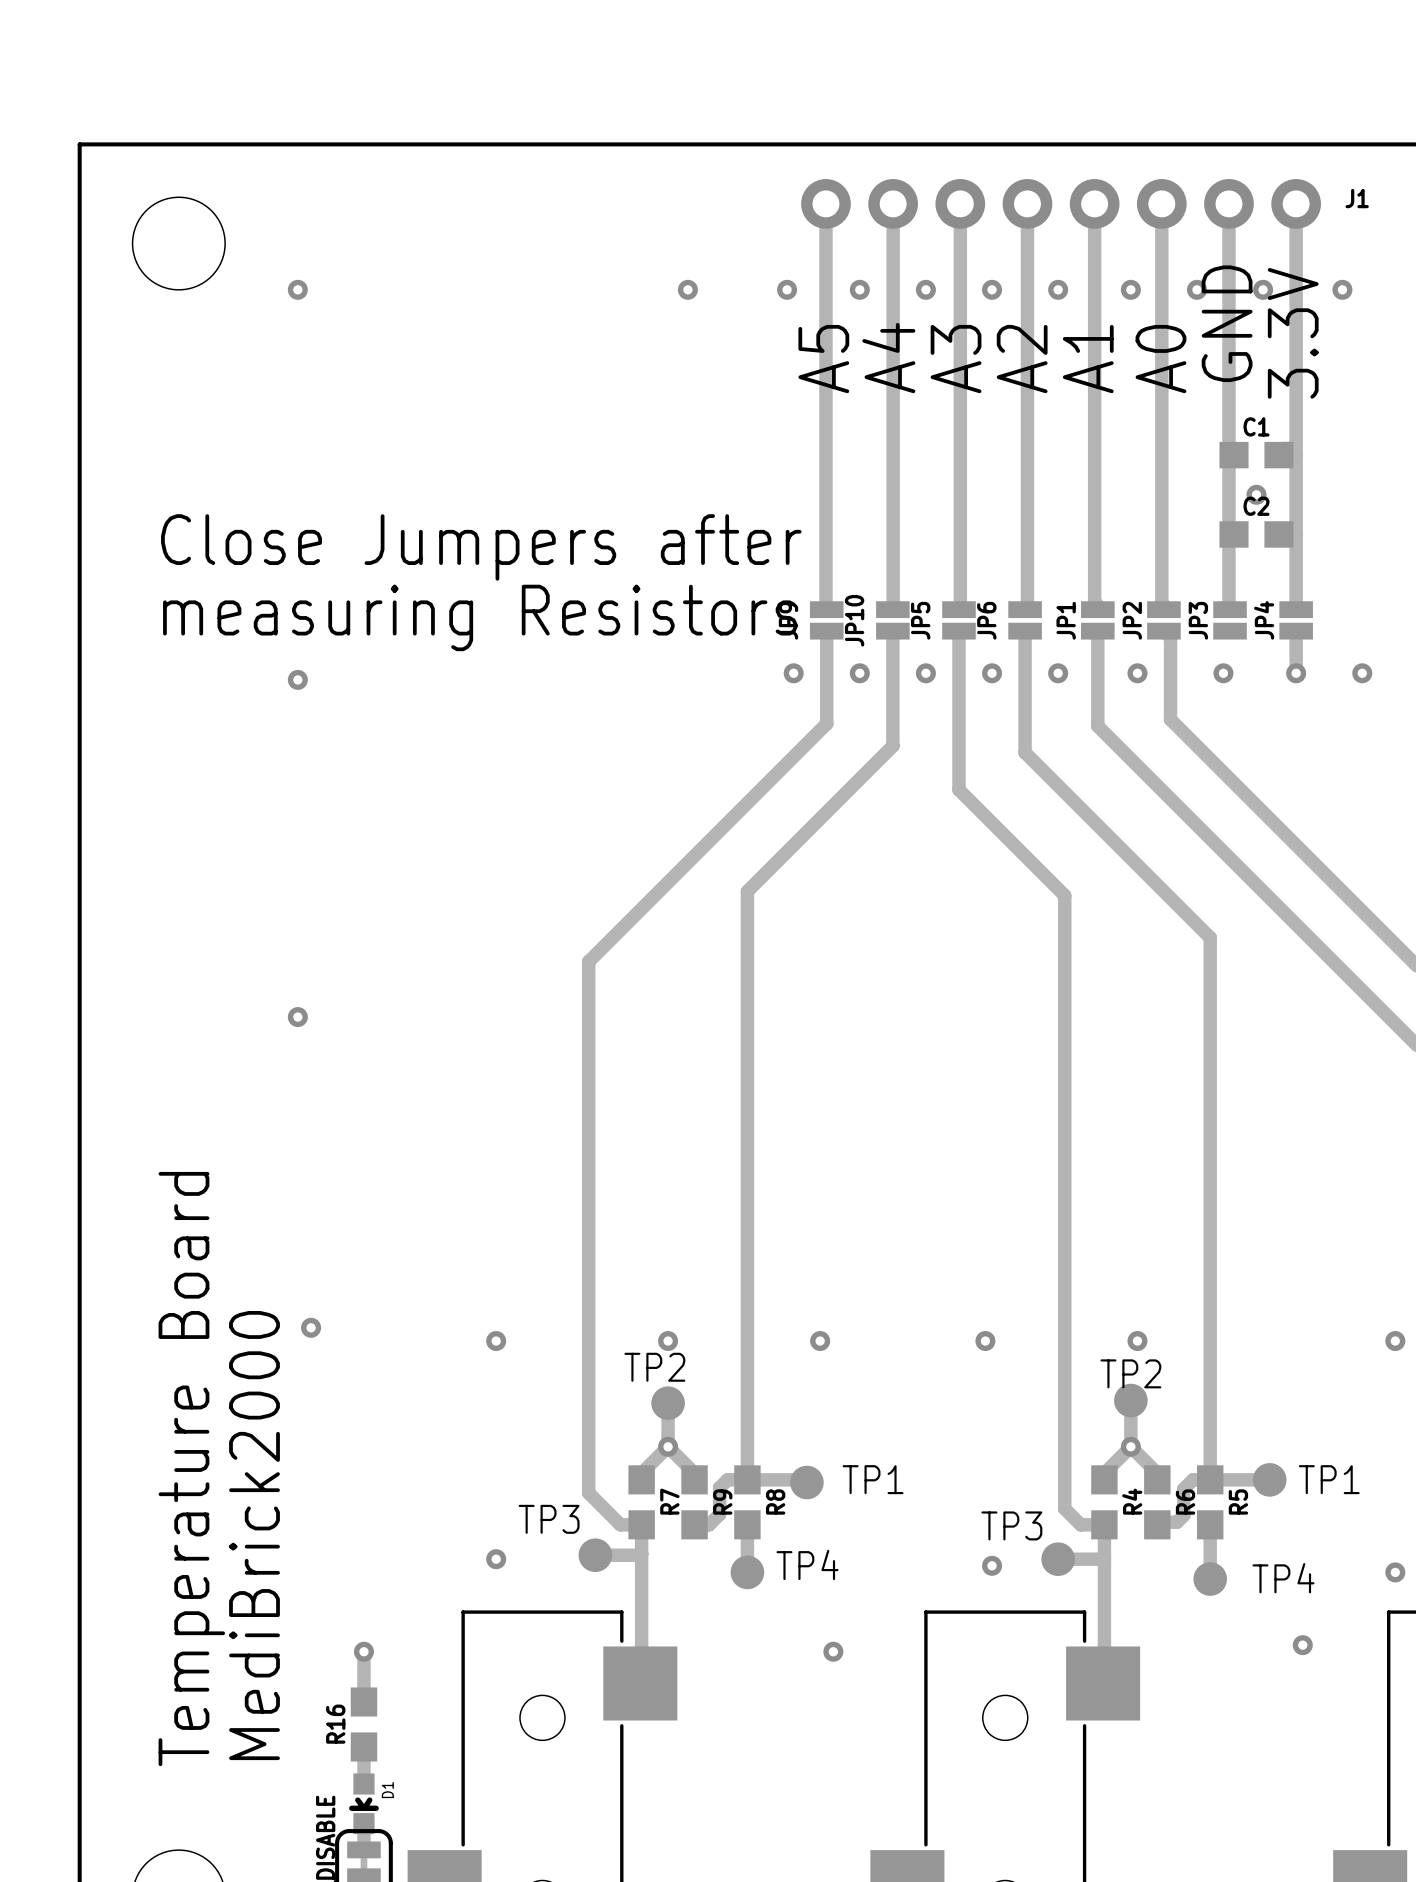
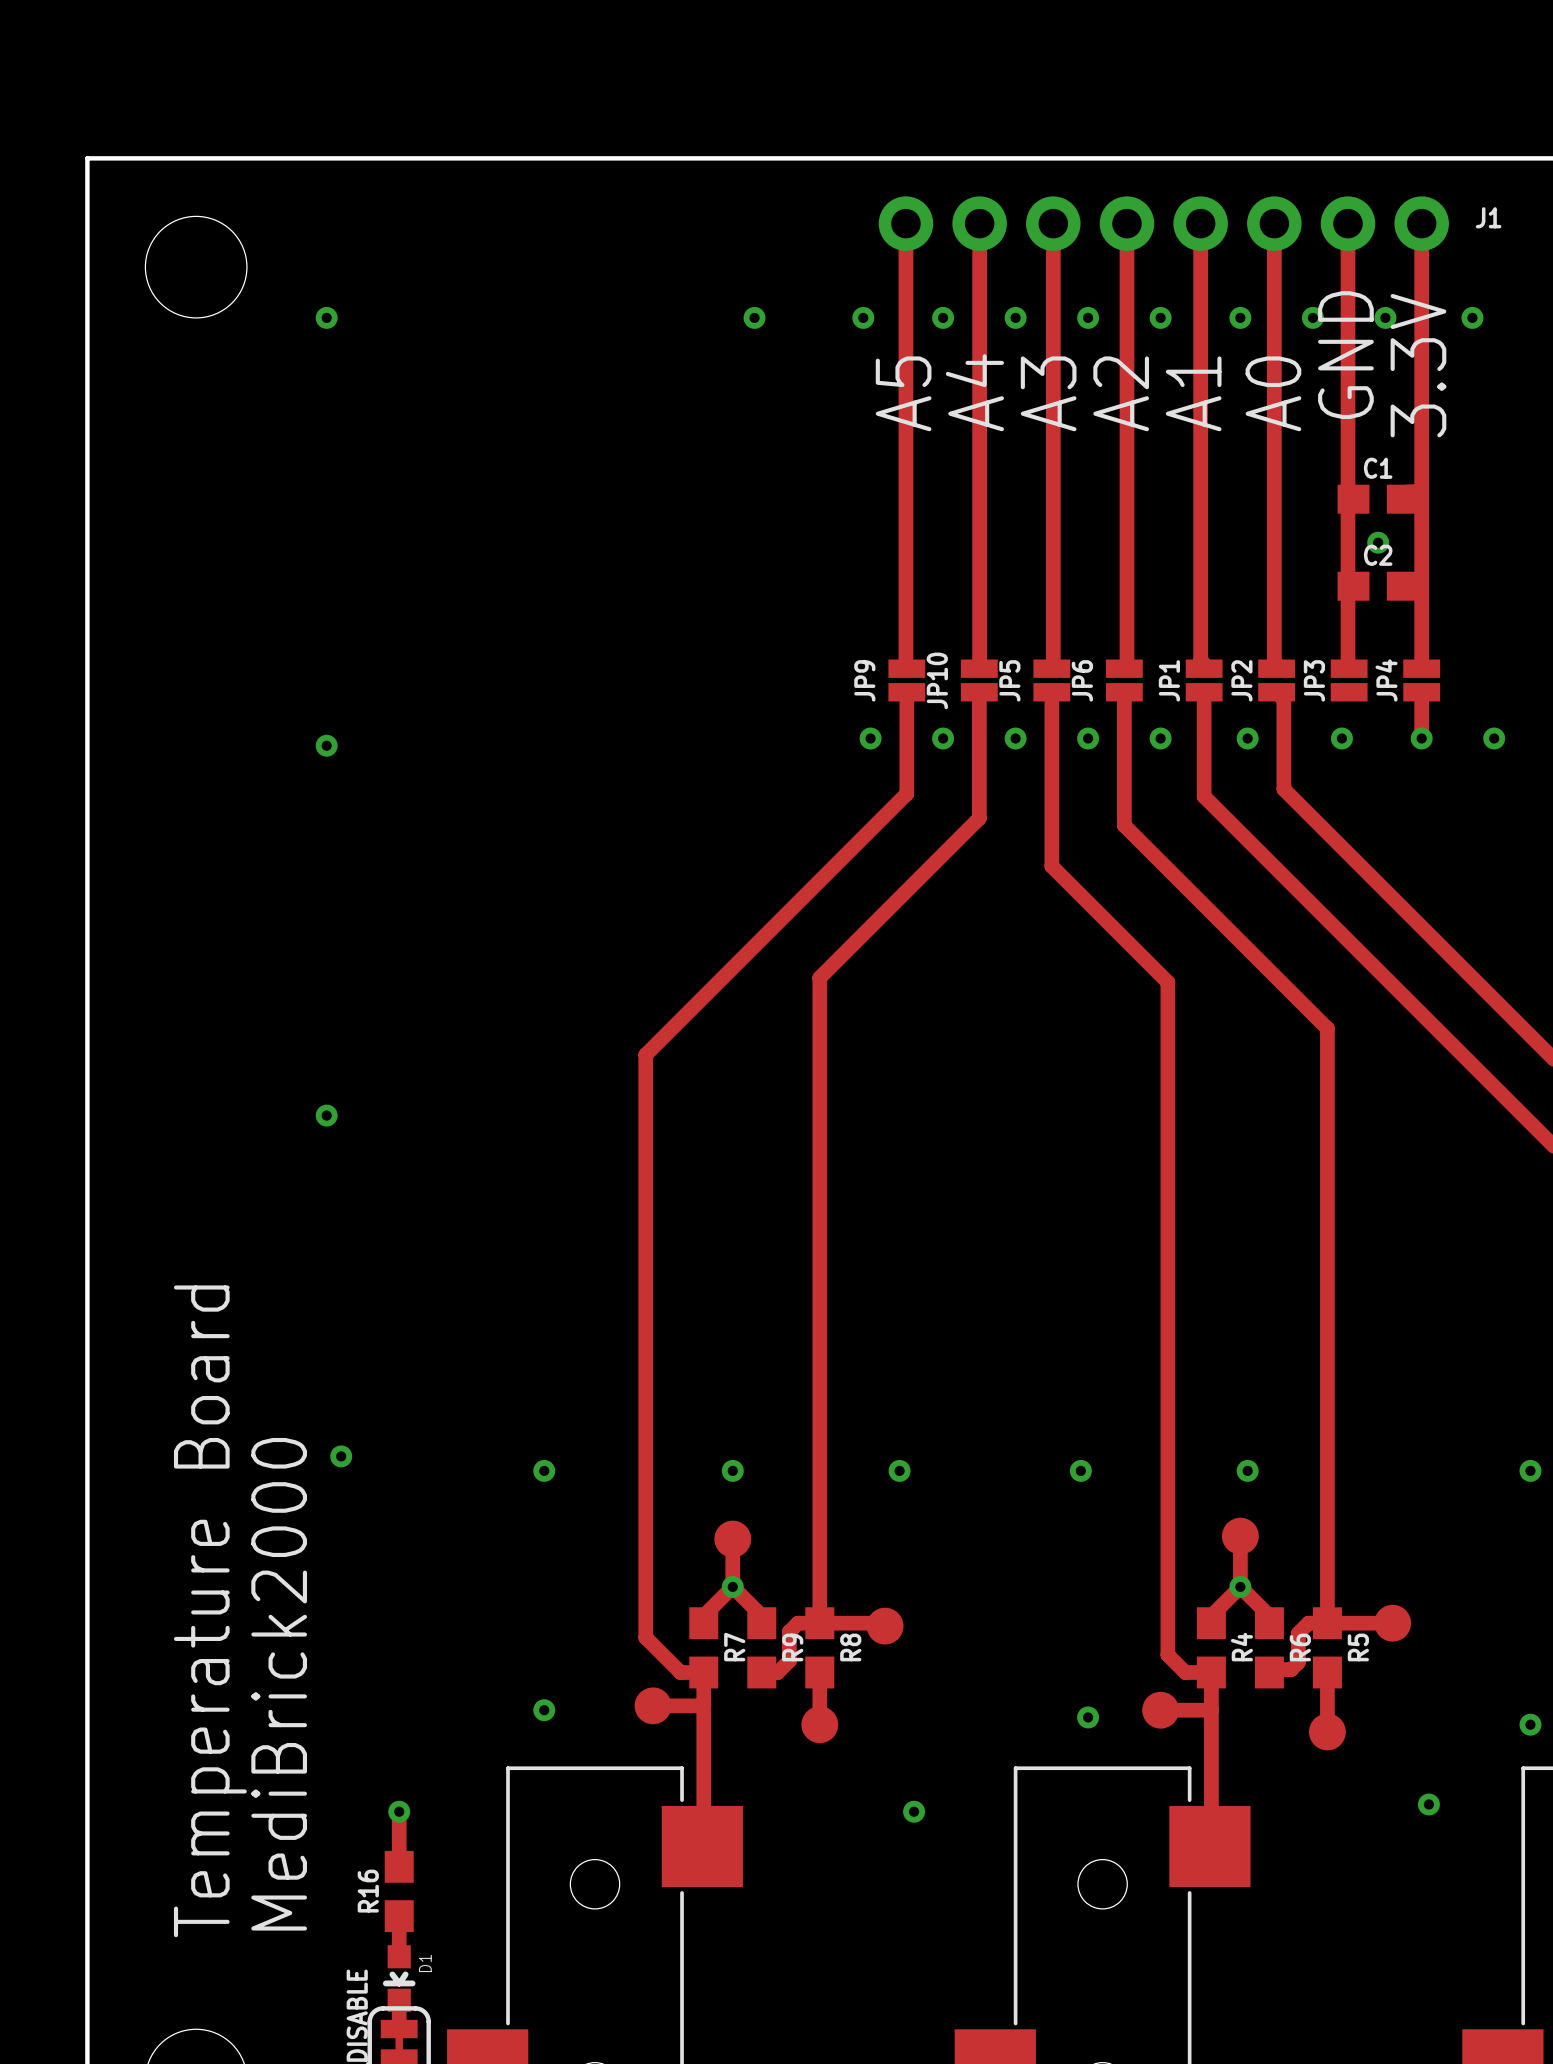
text: Close Jumpers after (481, 547) -> none
text: measuring Resistors (480, 617) -> none
text: TP2 (654, 1367) -> none
text: TP2 (1130, 1373) -> none
text: TP1 (873, 1479) -> none
text: TP1 (1329, 1479) -> none
text: TP3 (549, 1519) -> none
text: TP3 (1011, 1525) -> none
text: TP4 (807, 1564) -> none
text: TP4 (1283, 1578) -> none

